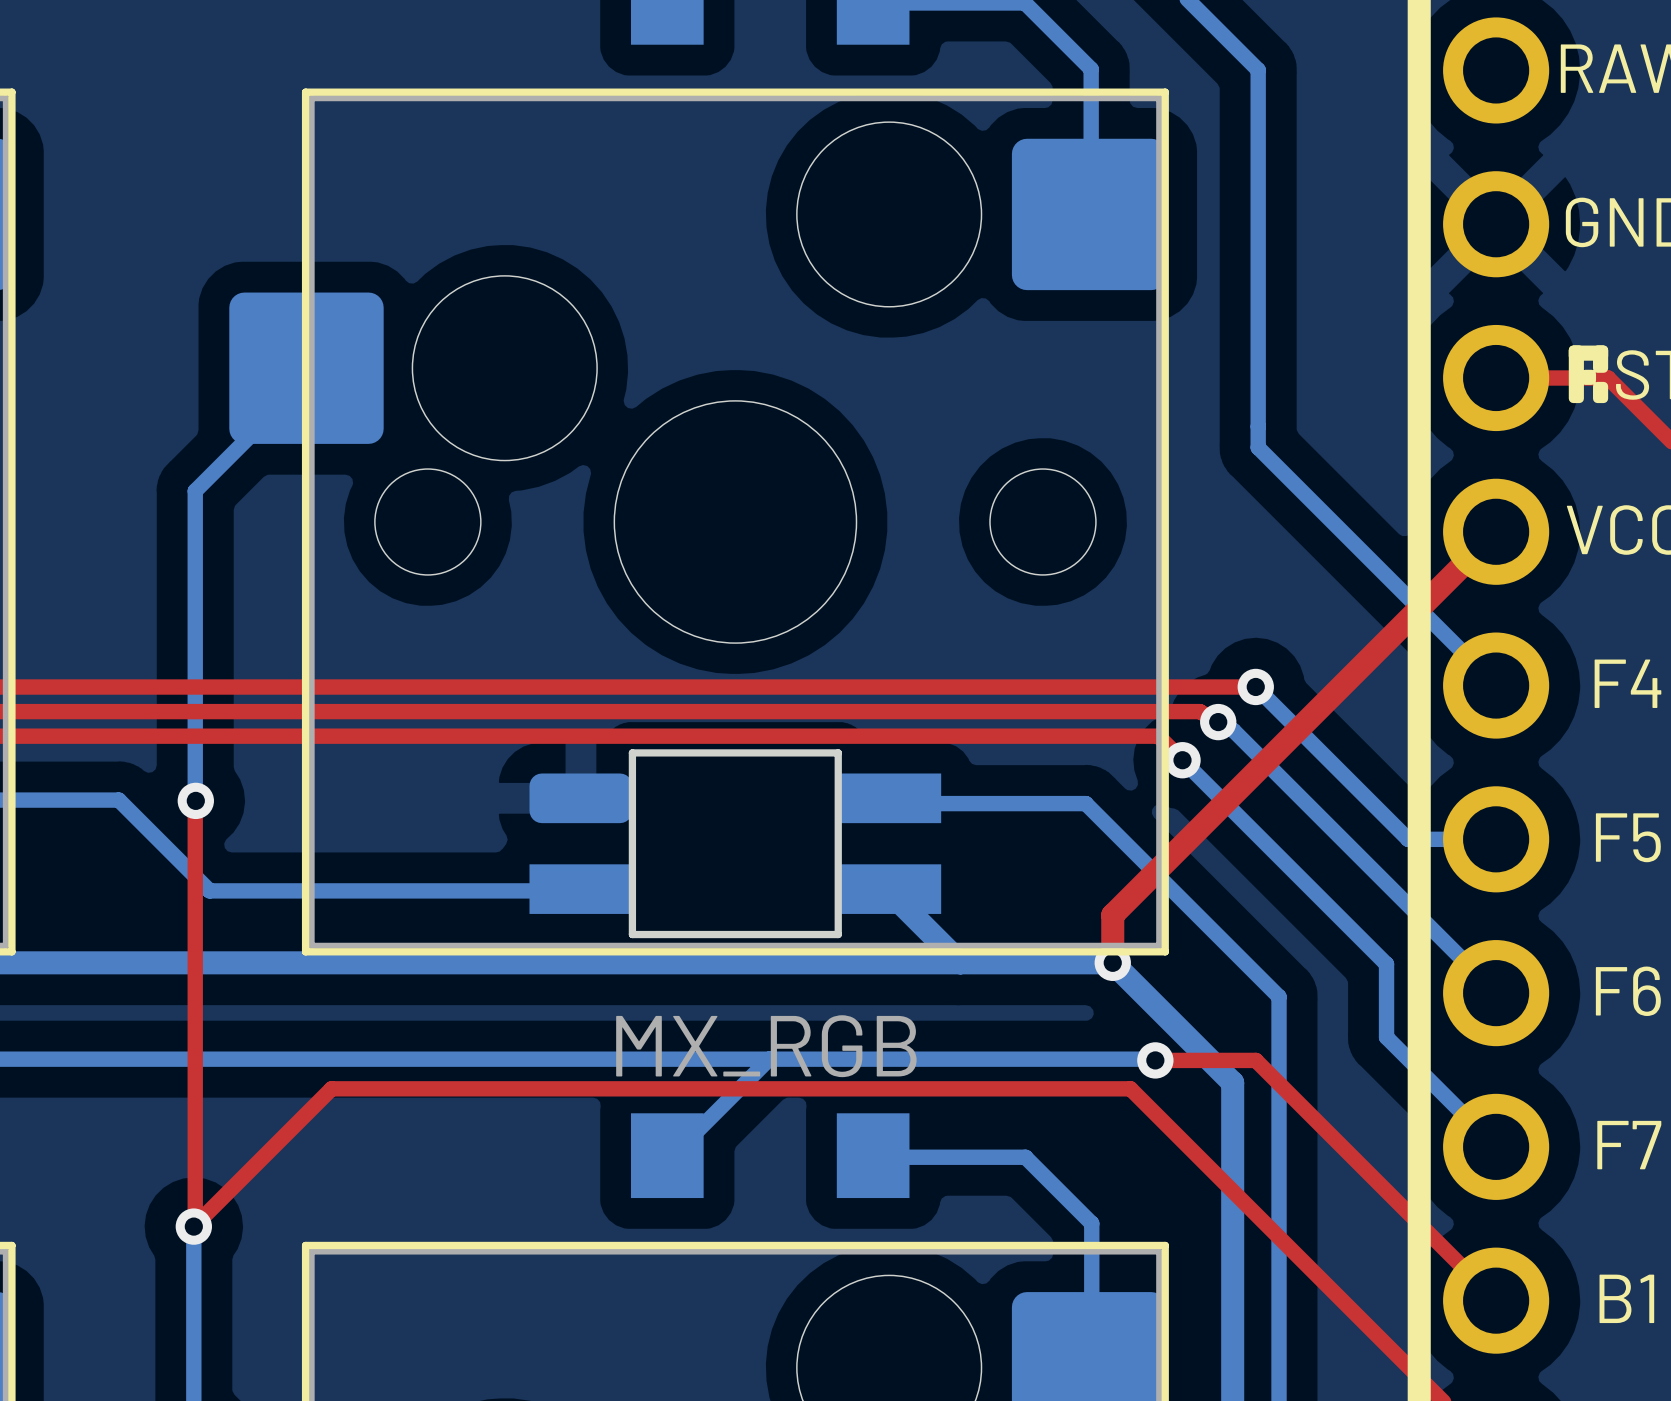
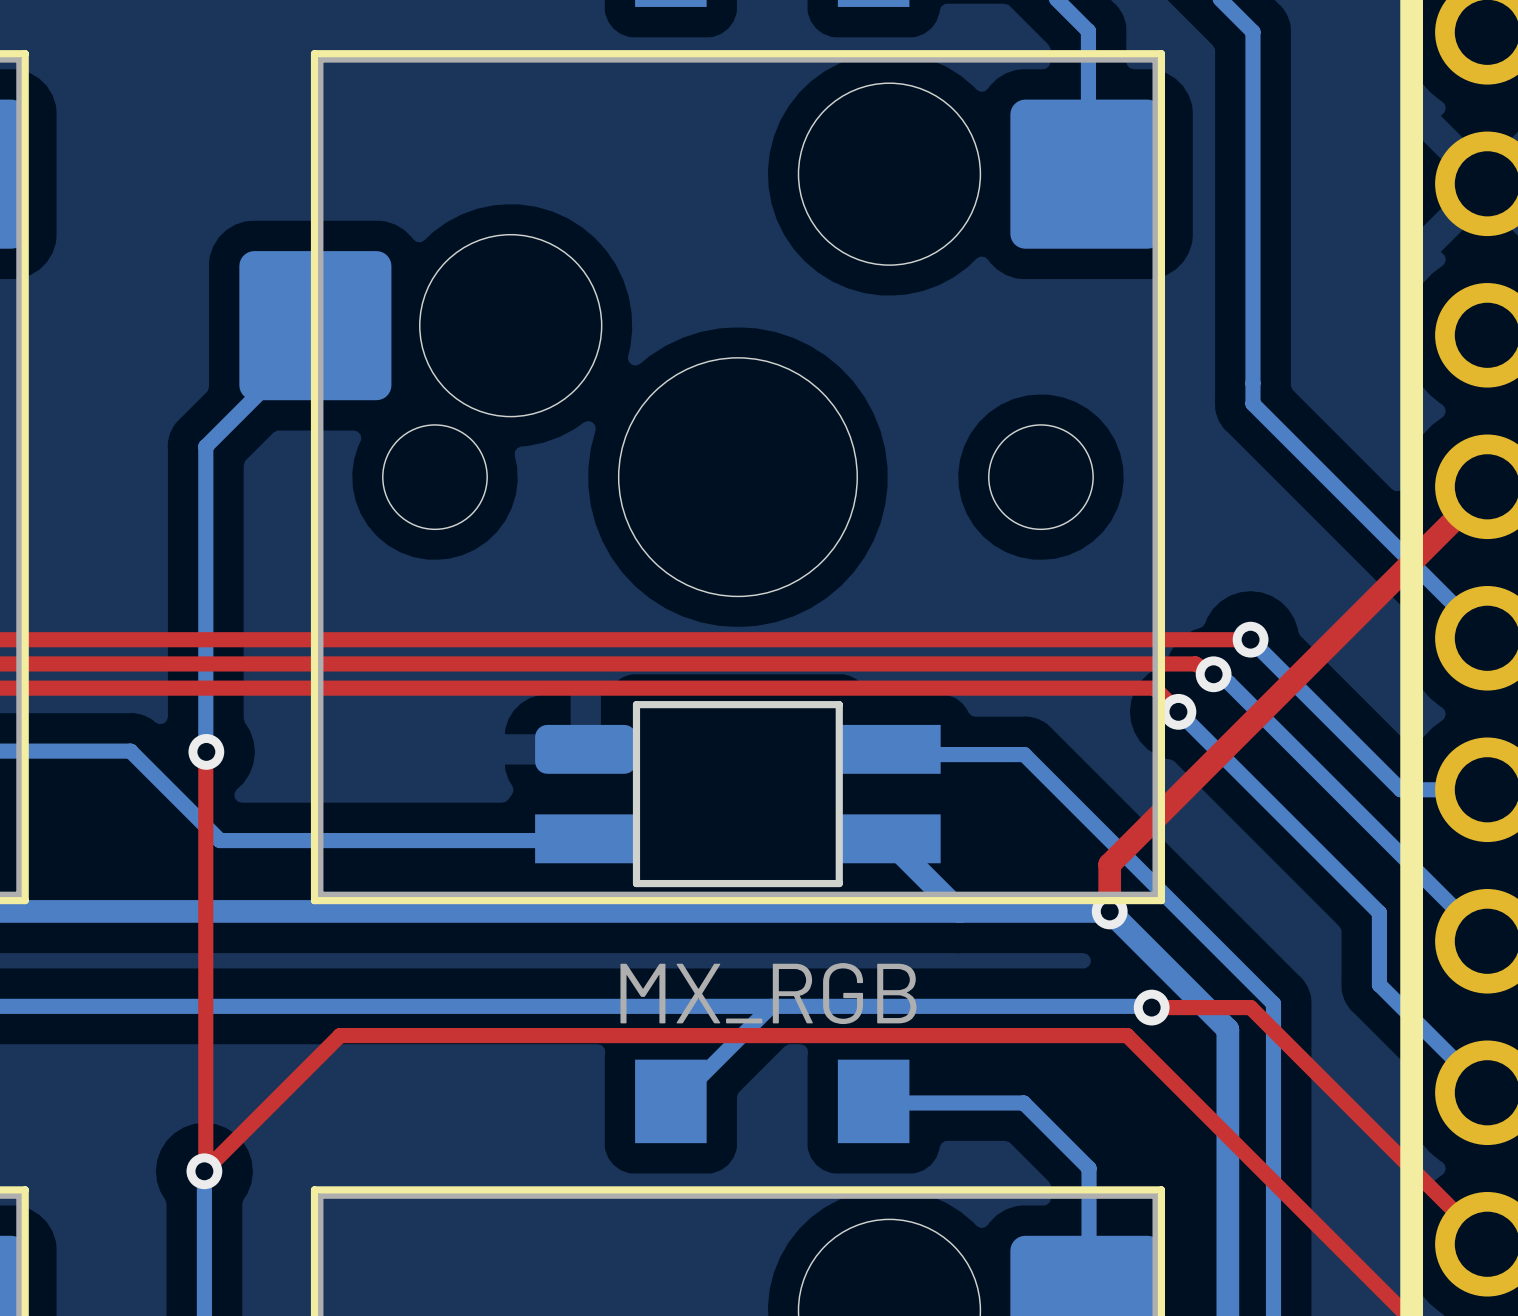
bottom track: (1026, 803) (1085, 803) (1279, 996) (1279, 1056) -> (1024, 754) (1273, 1003)

